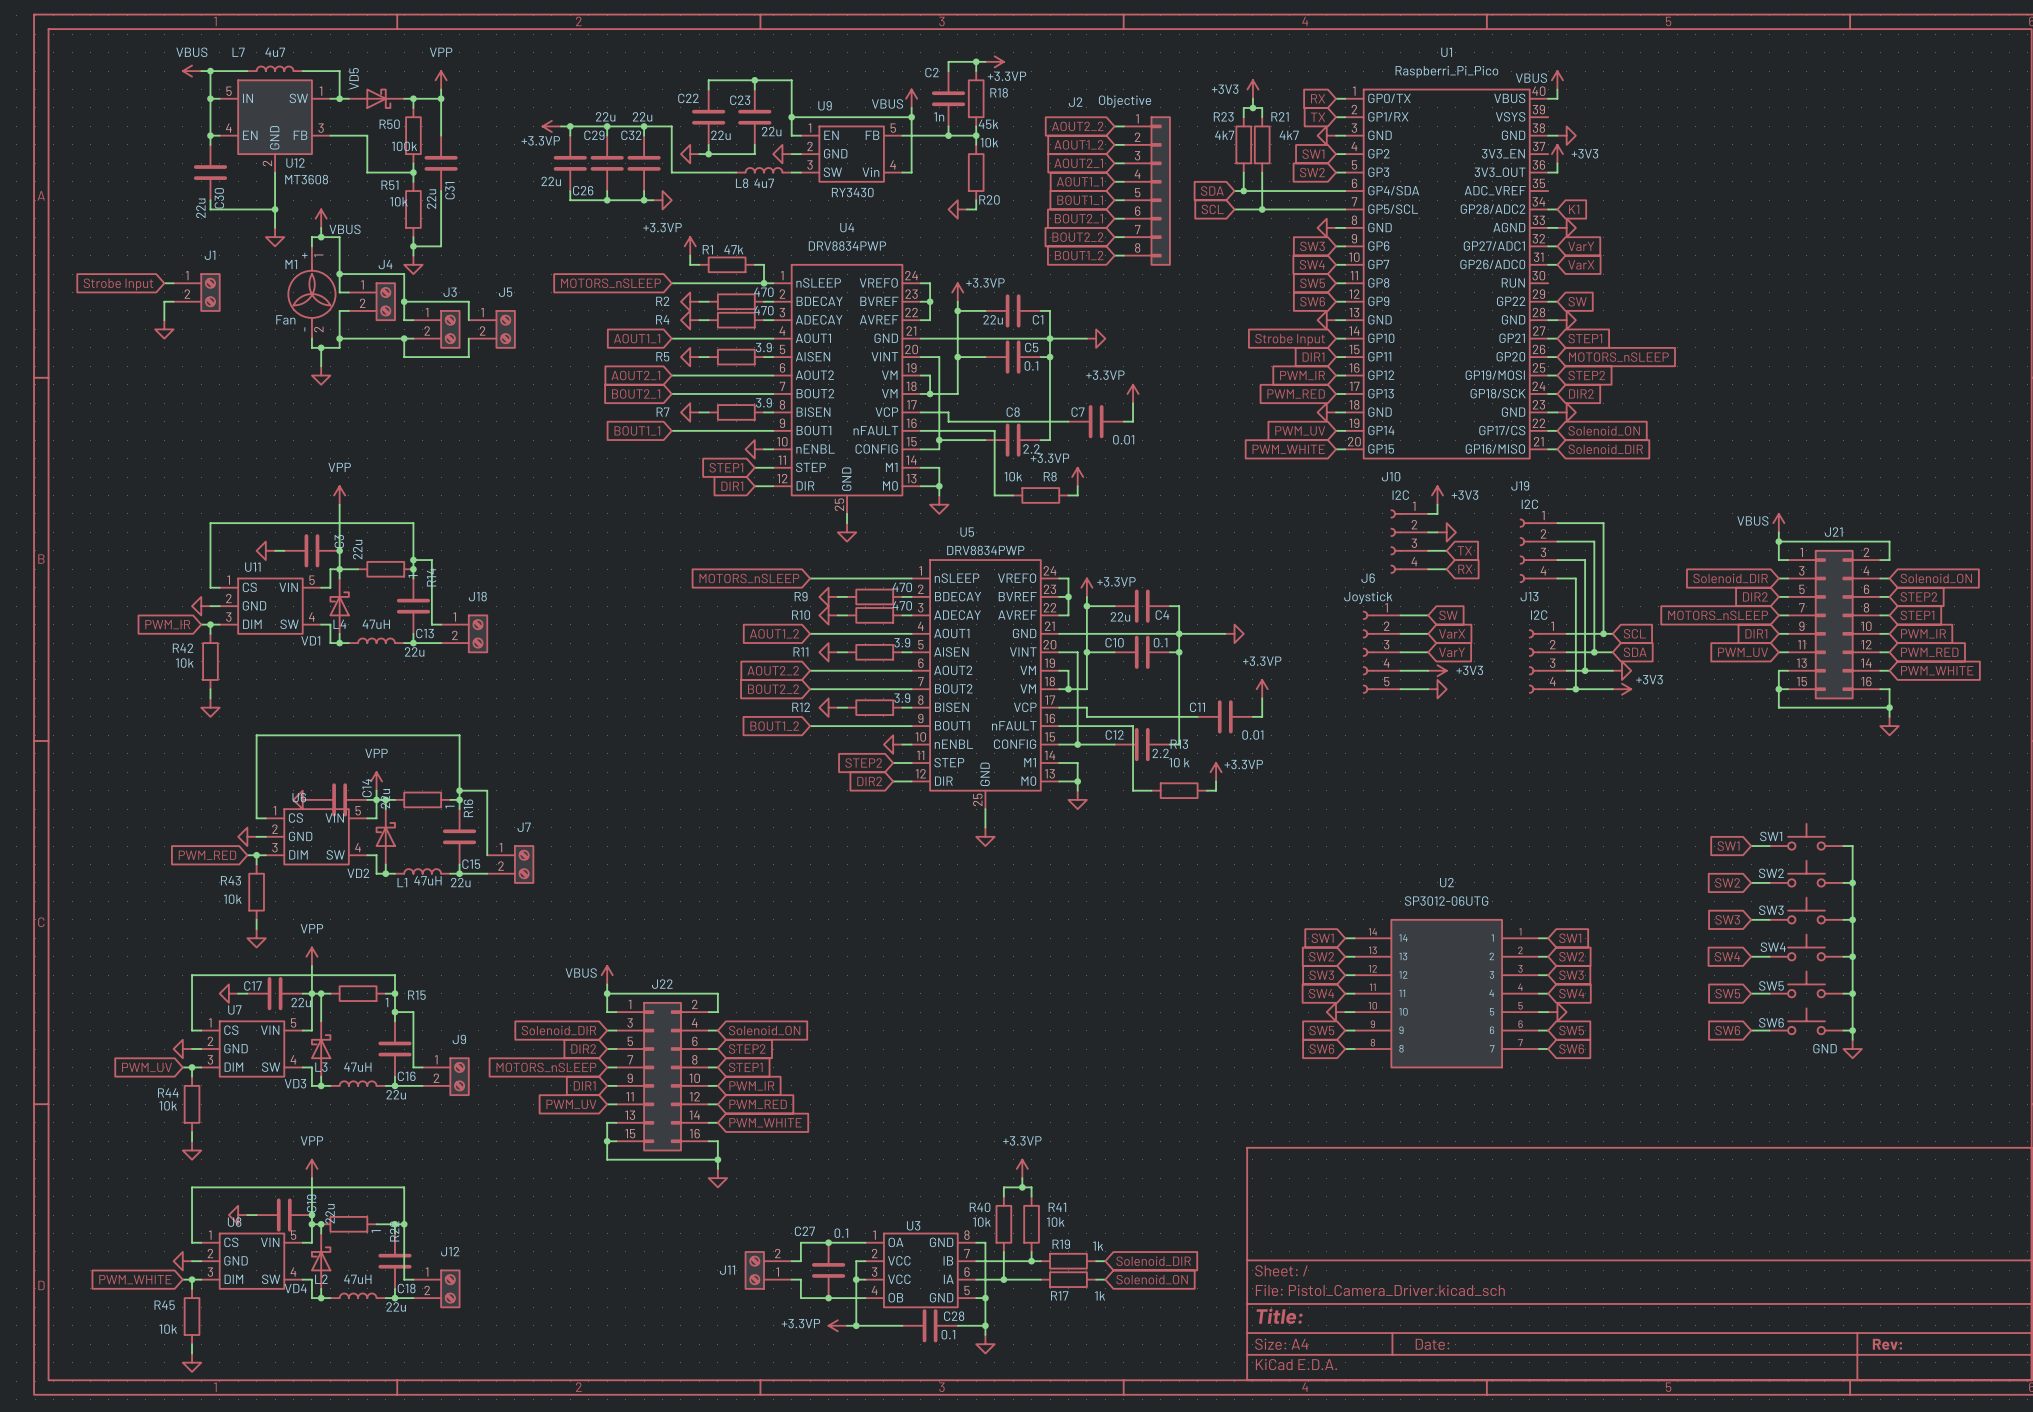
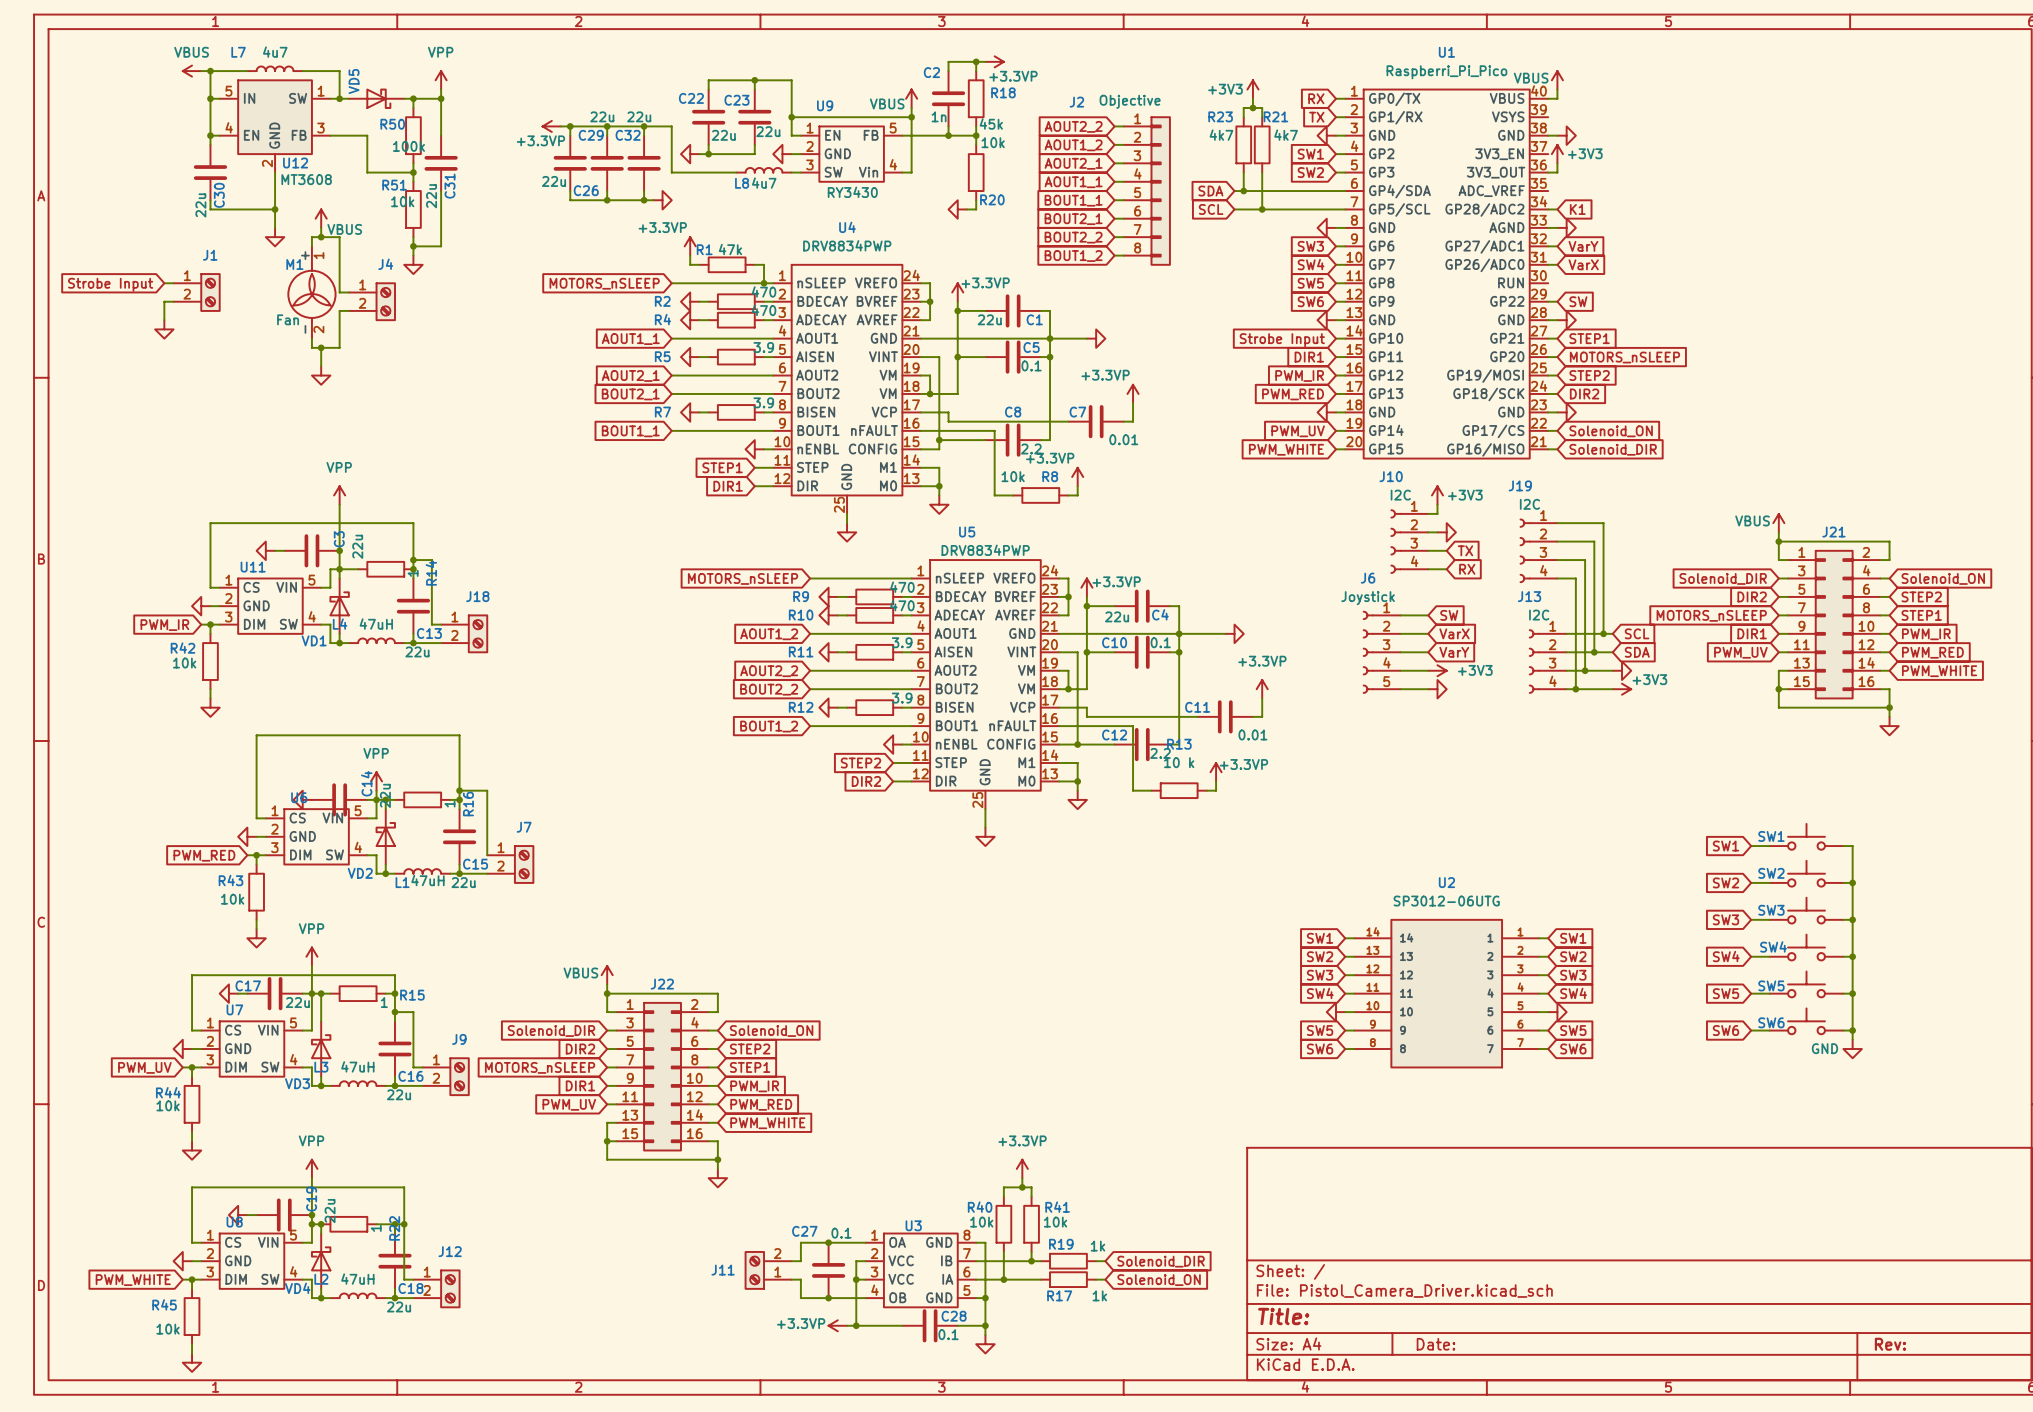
wire: (339, 274) (404, 274) (404, 320) (413, 320) -> none
junction: (339, 274) -> none
wire: (404, 301) (468, 301) (468, 320) -> none
junction: (404, 301) -> none
J3: (436, 329) -> none
J5: (492, 329) -> none
wire: (339, 338) (413, 338) -> none
junction: (339, 338) -> none
wire: (404, 338) (404, 357) (468, 357) (468, 338) -> none
junction: (404, 338) -> none

